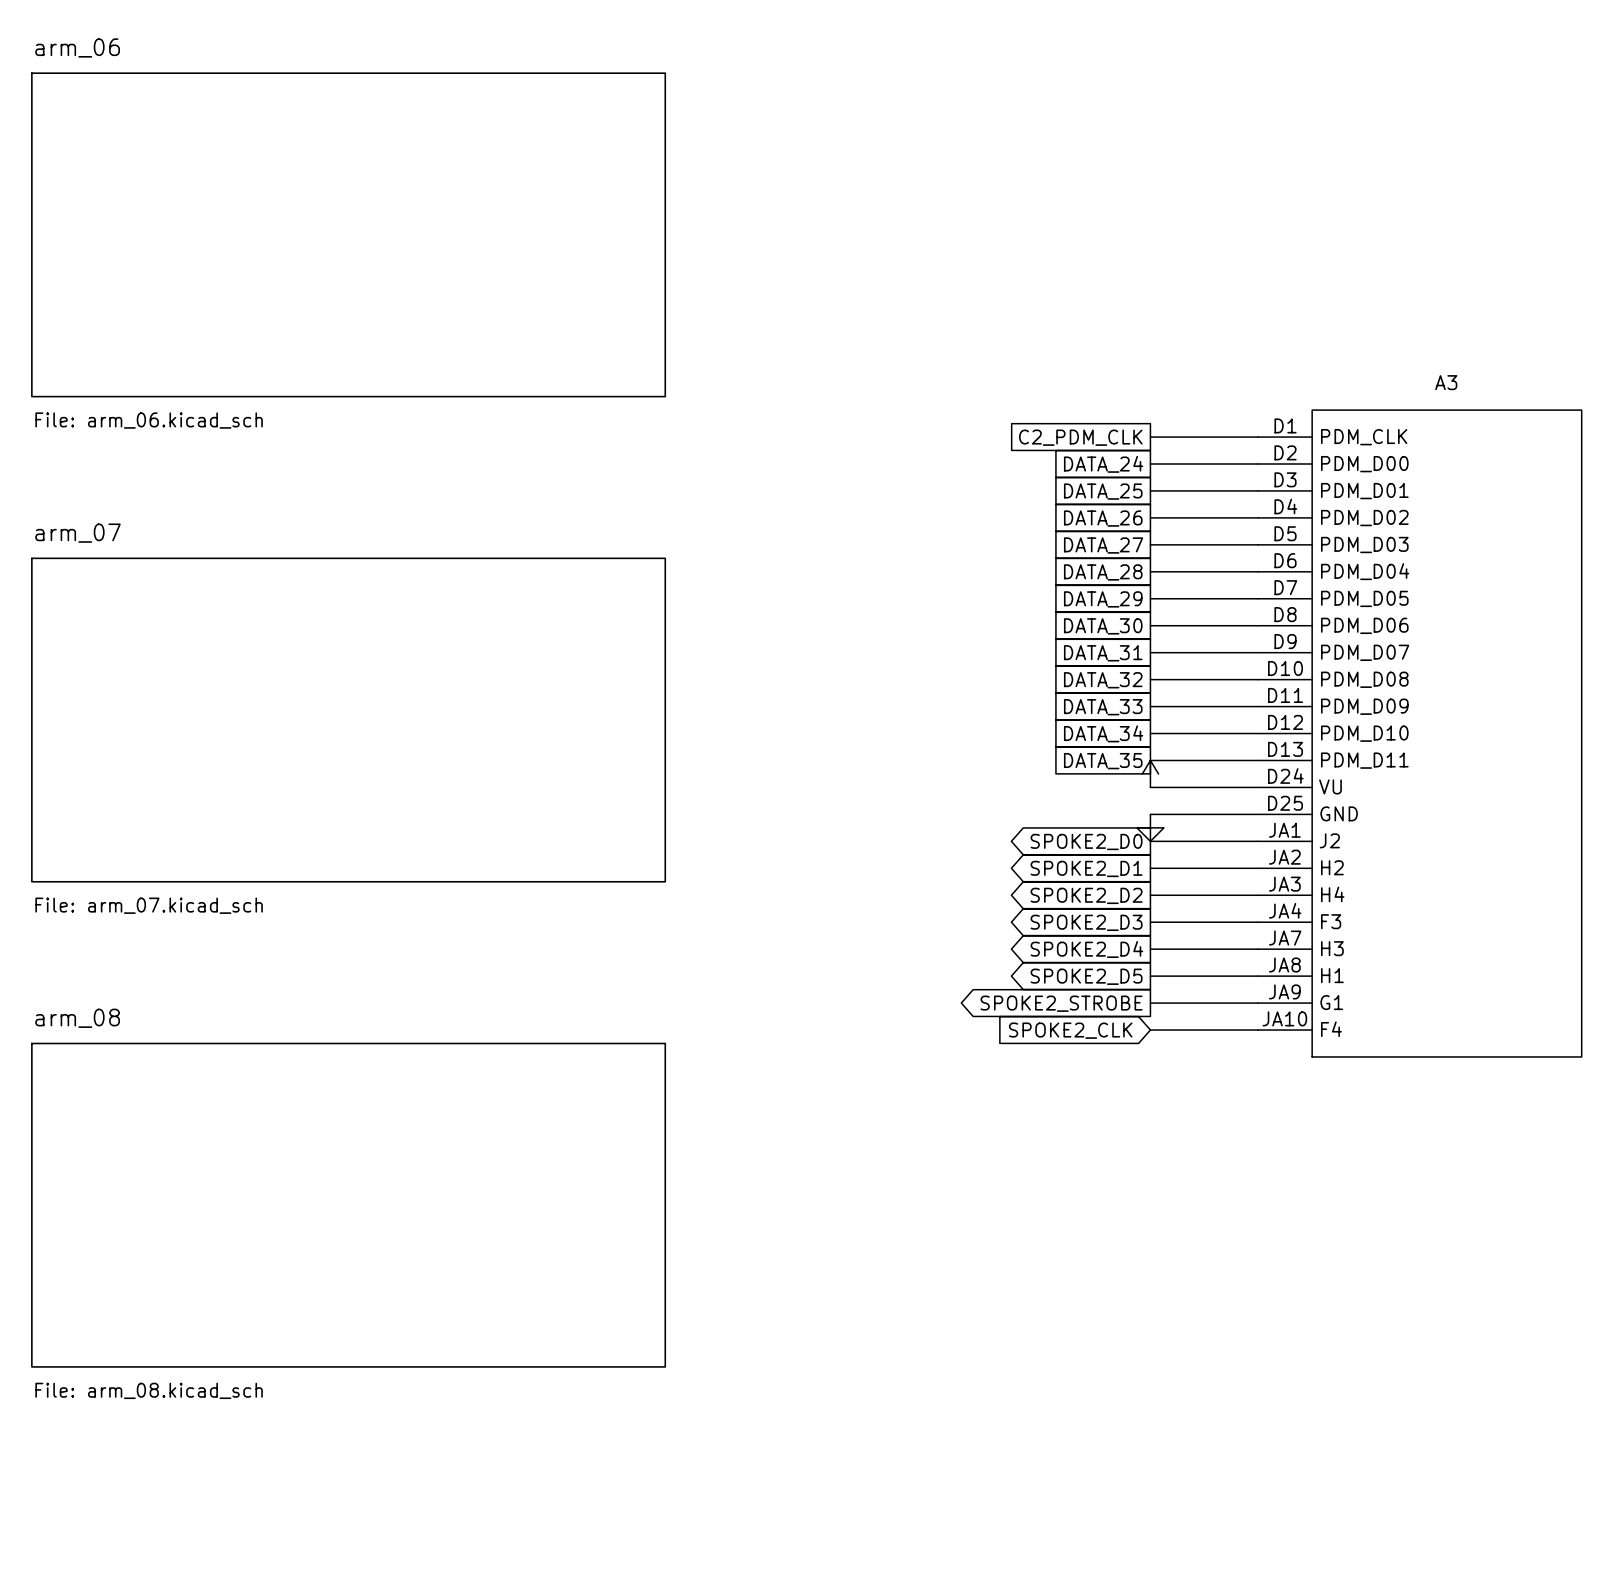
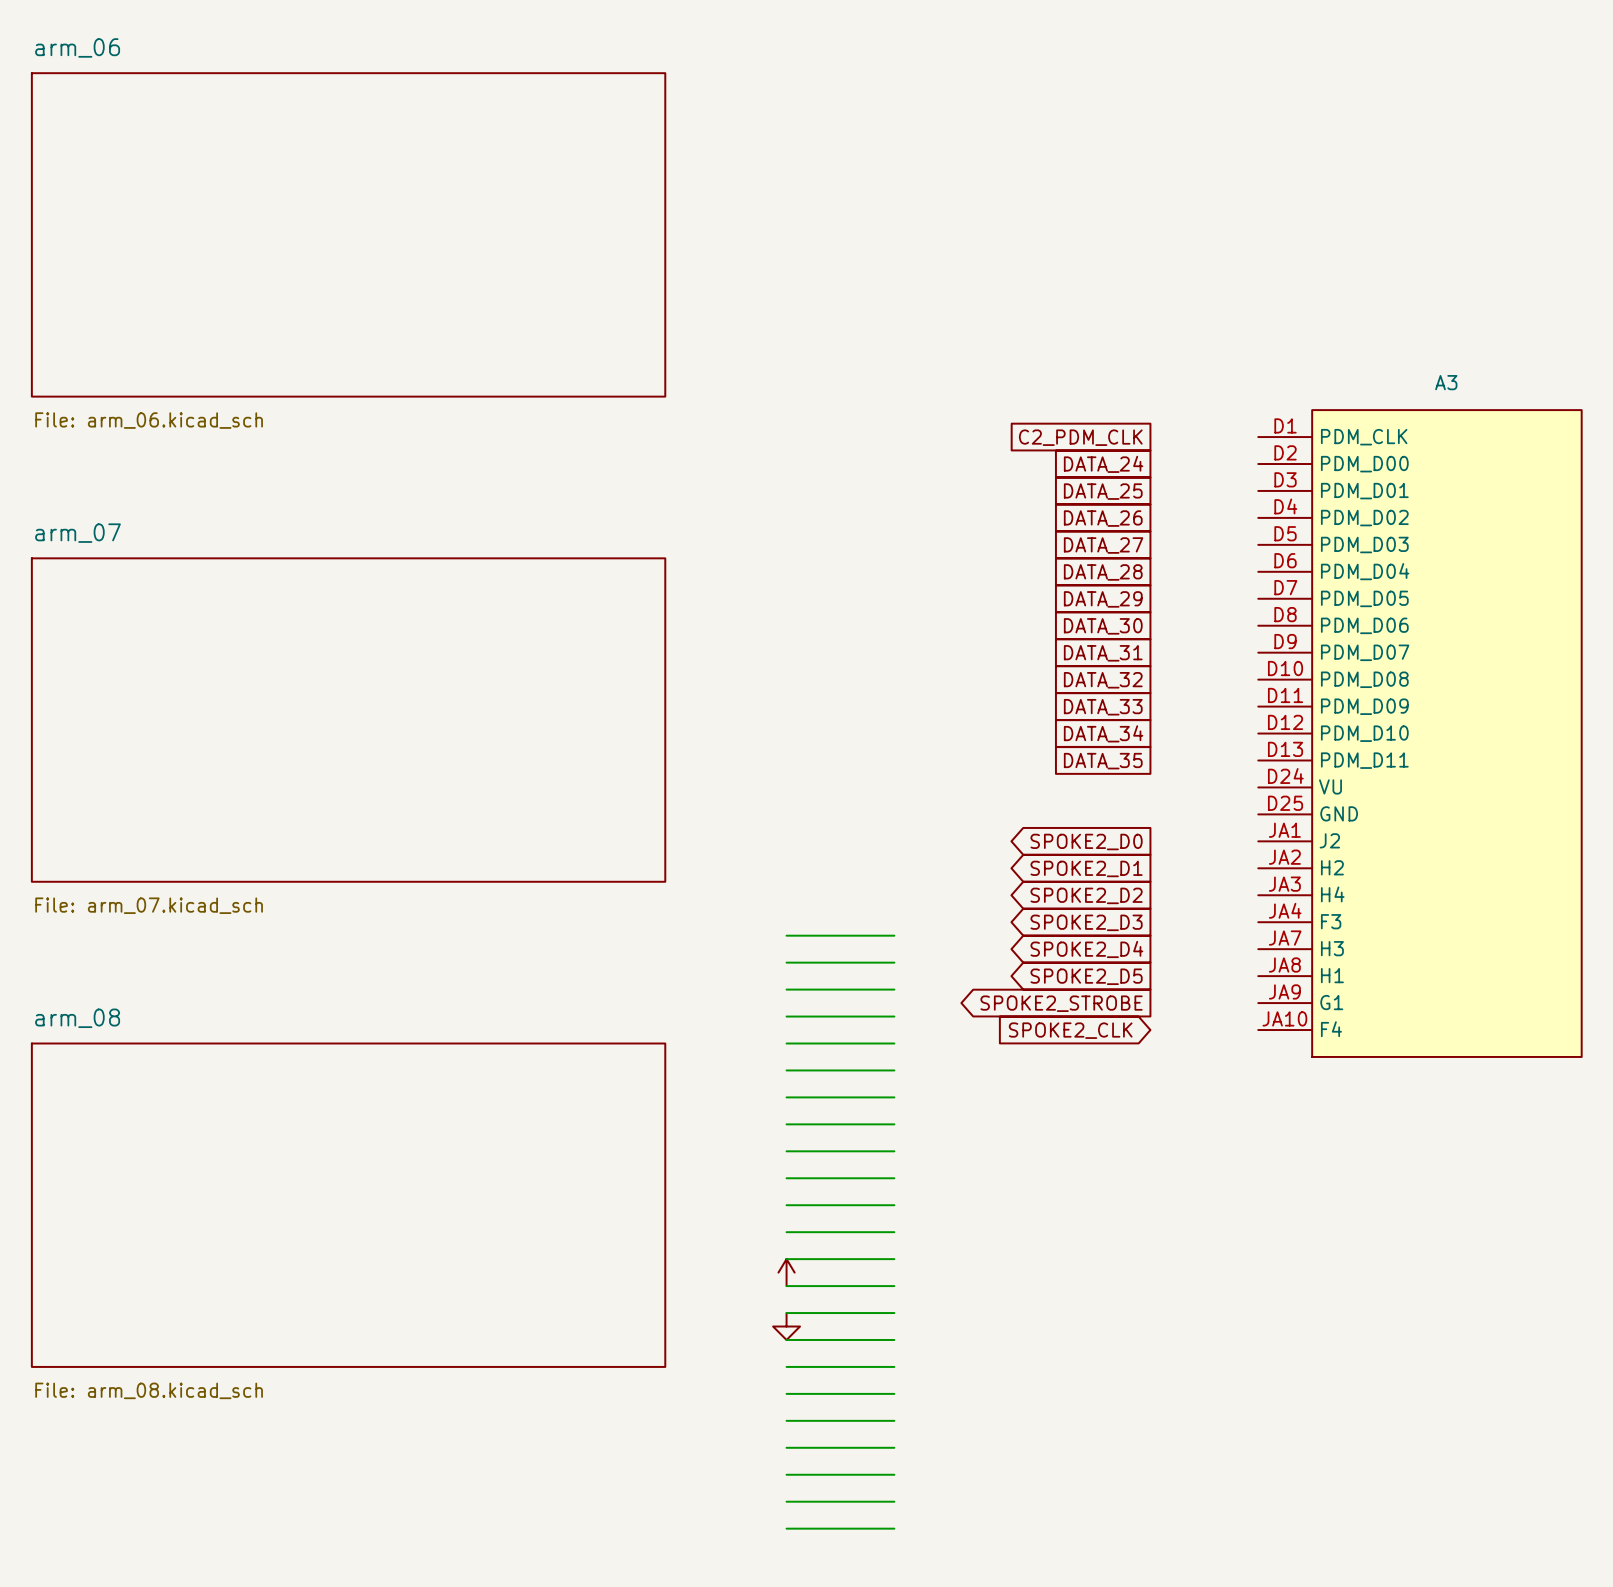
wire: (1150, 437) (1258, 437) -> none
wire: (1150, 464) (1258, 464) -> none
wire: (1150, 490) (1258, 490) -> none
wire: (1150, 517) (1258, 517) -> none
wire: (1150, 544) (1258, 544) -> none
wire: (1150, 571) (1258, 571) -> none
wire: (1150, 598) (1258, 598) -> none
wire: (1150, 625) (1258, 625) -> none
wire: (1150, 652) (1258, 652) -> none
wire: (1150, 679) (1258, 679) -> none
wire: (1150, 706) (1258, 706) -> none
wire: (1150, 733) (1258, 733) -> none
wire: (1150, 760) (1258, 760) -> none
power symbol: (1150, 773) -> none
wire: (1150, 787) (1258, 787) -> none
wire: (1150, 814) (1258, 814) -> none
power symbol: (1150, 827) -> none
wire: (1150, 841) (1258, 841) -> none
wire: (1150, 868) (1258, 868) -> none
wire: (1150, 895) (1258, 895) -> none
wire: (1150, 922) (1258, 922) -> none
wire: none -> (786, 935) (894, 935)
wire: (1150, 949) (1258, 949) -> none
wire: none -> (786, 962) (894, 962)
wire: (1150, 976) (1258, 976) -> none
wire: none -> (786, 989) (894, 989)
wire: (1150, 1003) (1258, 1003) -> none
wire: none -> (786, 1016) (894, 1016)
wire: (1150, 1030) (1258, 1030) -> none
wire: none -> (786, 1043) (894, 1043)
wire: none -> (786, 1070) (894, 1070)
wire: none -> (786, 1097) (894, 1097)
wire: none -> (786, 1124) (894, 1124)
wire: none -> (786, 1151) (894, 1151)
wire: none -> (786, 1178) (894, 1178)
wire: none -> (786, 1205) (894, 1205)
wire: none -> (786, 1232) (894, 1232)
wire: none -> (786, 1259) (894, 1259)
power symbol: none -> (786, 1272)
wire: none -> (786, 1286) (894, 1286)
wire: none -> (786, 1313) (894, 1313)
power symbol: none -> (786, 1326)
wire: none -> (786, 1339) (894, 1339)
wire: none -> (786, 1366) (894, 1366)
wire: none -> (786, 1393) (894, 1393)
wire: none -> (786, 1420) (894, 1420)
wire: none -> (786, 1447) (894, 1447)
wire: none -> (786, 1474) (894, 1474)
wire: none -> (786, 1501) (894, 1501)
wire: none -> (786, 1528) (894, 1528)

